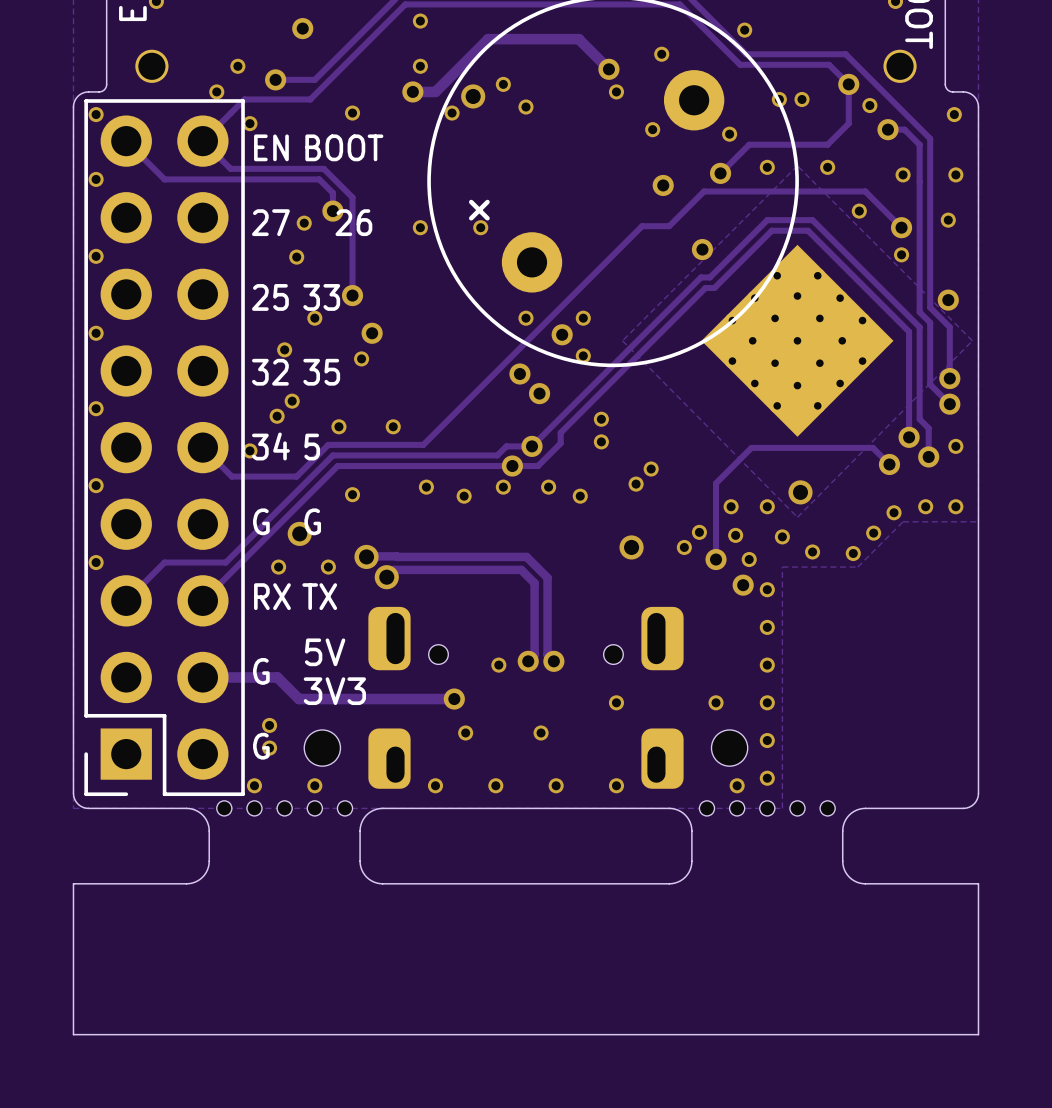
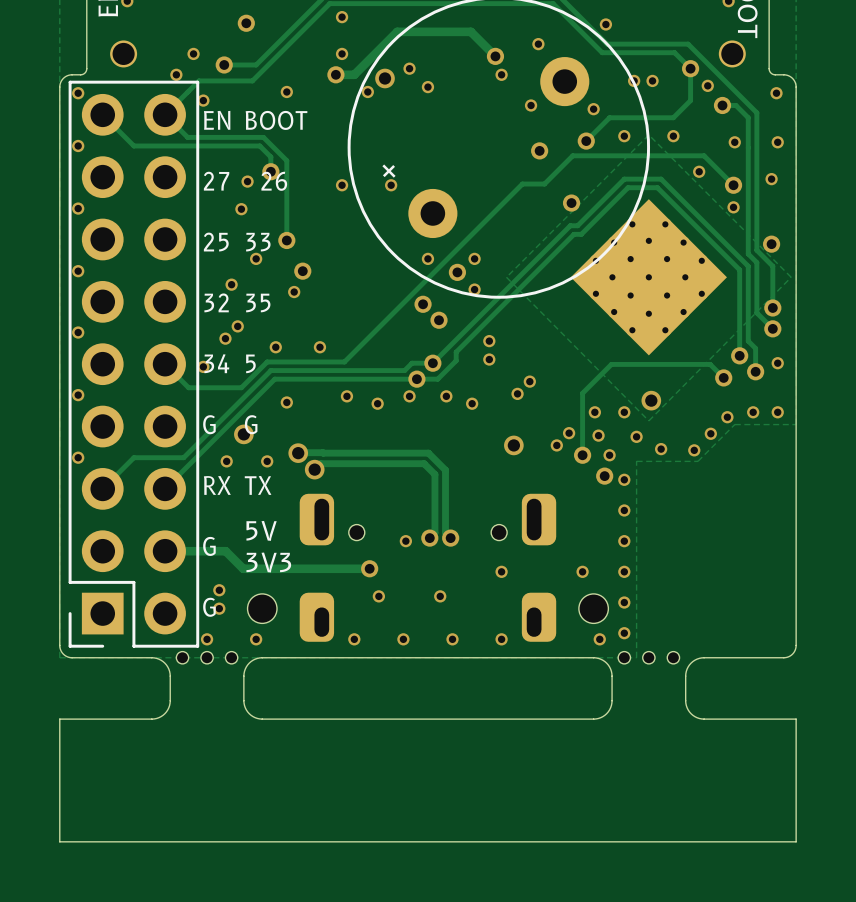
part footprint: [216, 800, 353, 816] -> [176, 651, 238, 664]
part footprint: [699, 800, 836, 816] -> [618, 651, 680, 664]
board edge: (382, 808) (374, 810) (366, 815) (361, 822) (360, 831) (361, 869) (368, 879) (382, 883) -> (311, 657) (257, 658) (247, 664) (243, 676) (244, 705) (253, 716) (262, 719) (311, 719)
board edge: (669, 808) (677, 810) (685, 815) (690, 822) (691, 831) (690, 869) (683, 879) (669, 883) -> (544, 657) (598, 658) (608, 664) (612, 676) (611, 705) (602, 716) (593, 719) (544, 719)

